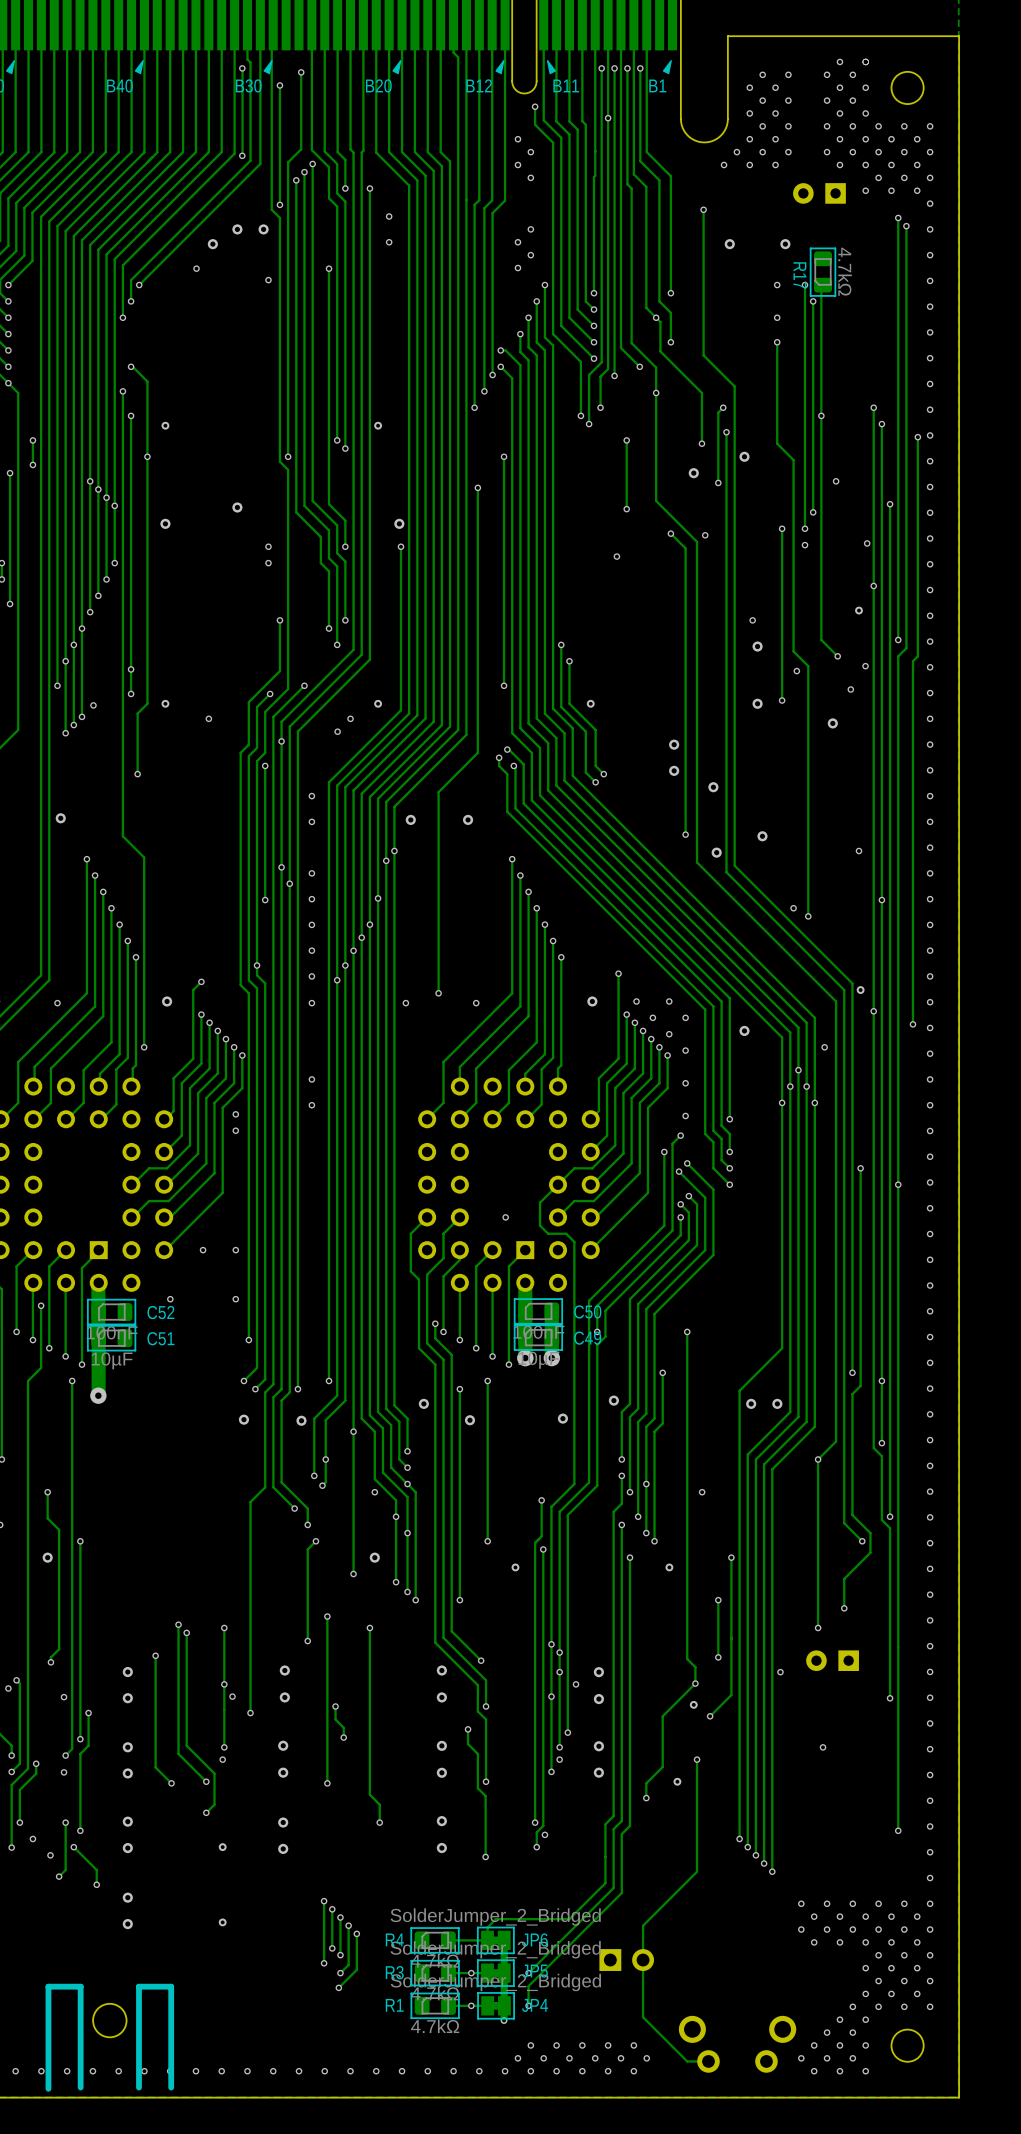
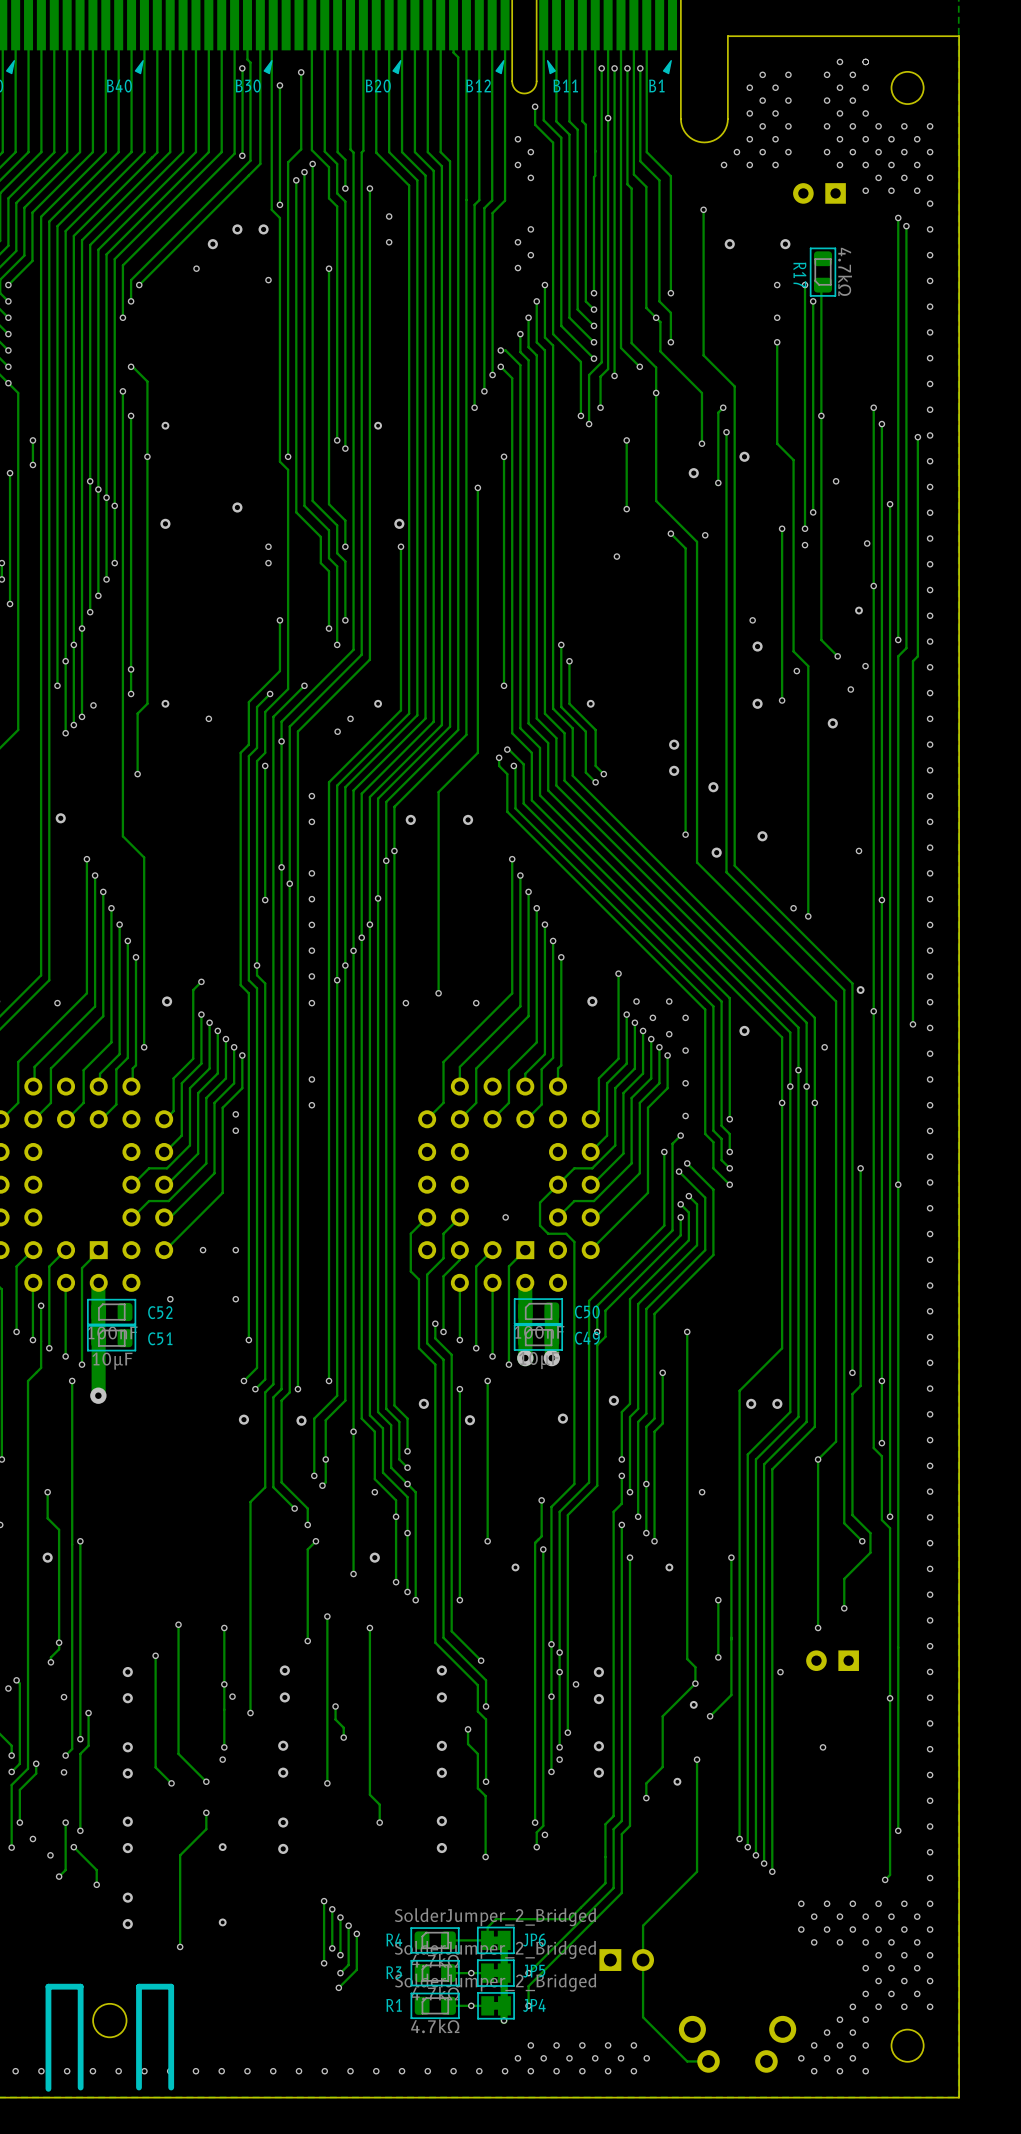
track: (186, 1632) (186, 1745) (214, 1773) (214, 1804) (206, 1812) -> (180, 1946) (180, 1855) (206, 1829) (206, 1812)
via: (186, 1632) -> none
via: none -> (59, 1642)
track: none -> (890, 1698) (890, 1874) (885, 1879)
via: none -> (885, 1879)
via: none -> (180, 1946)

